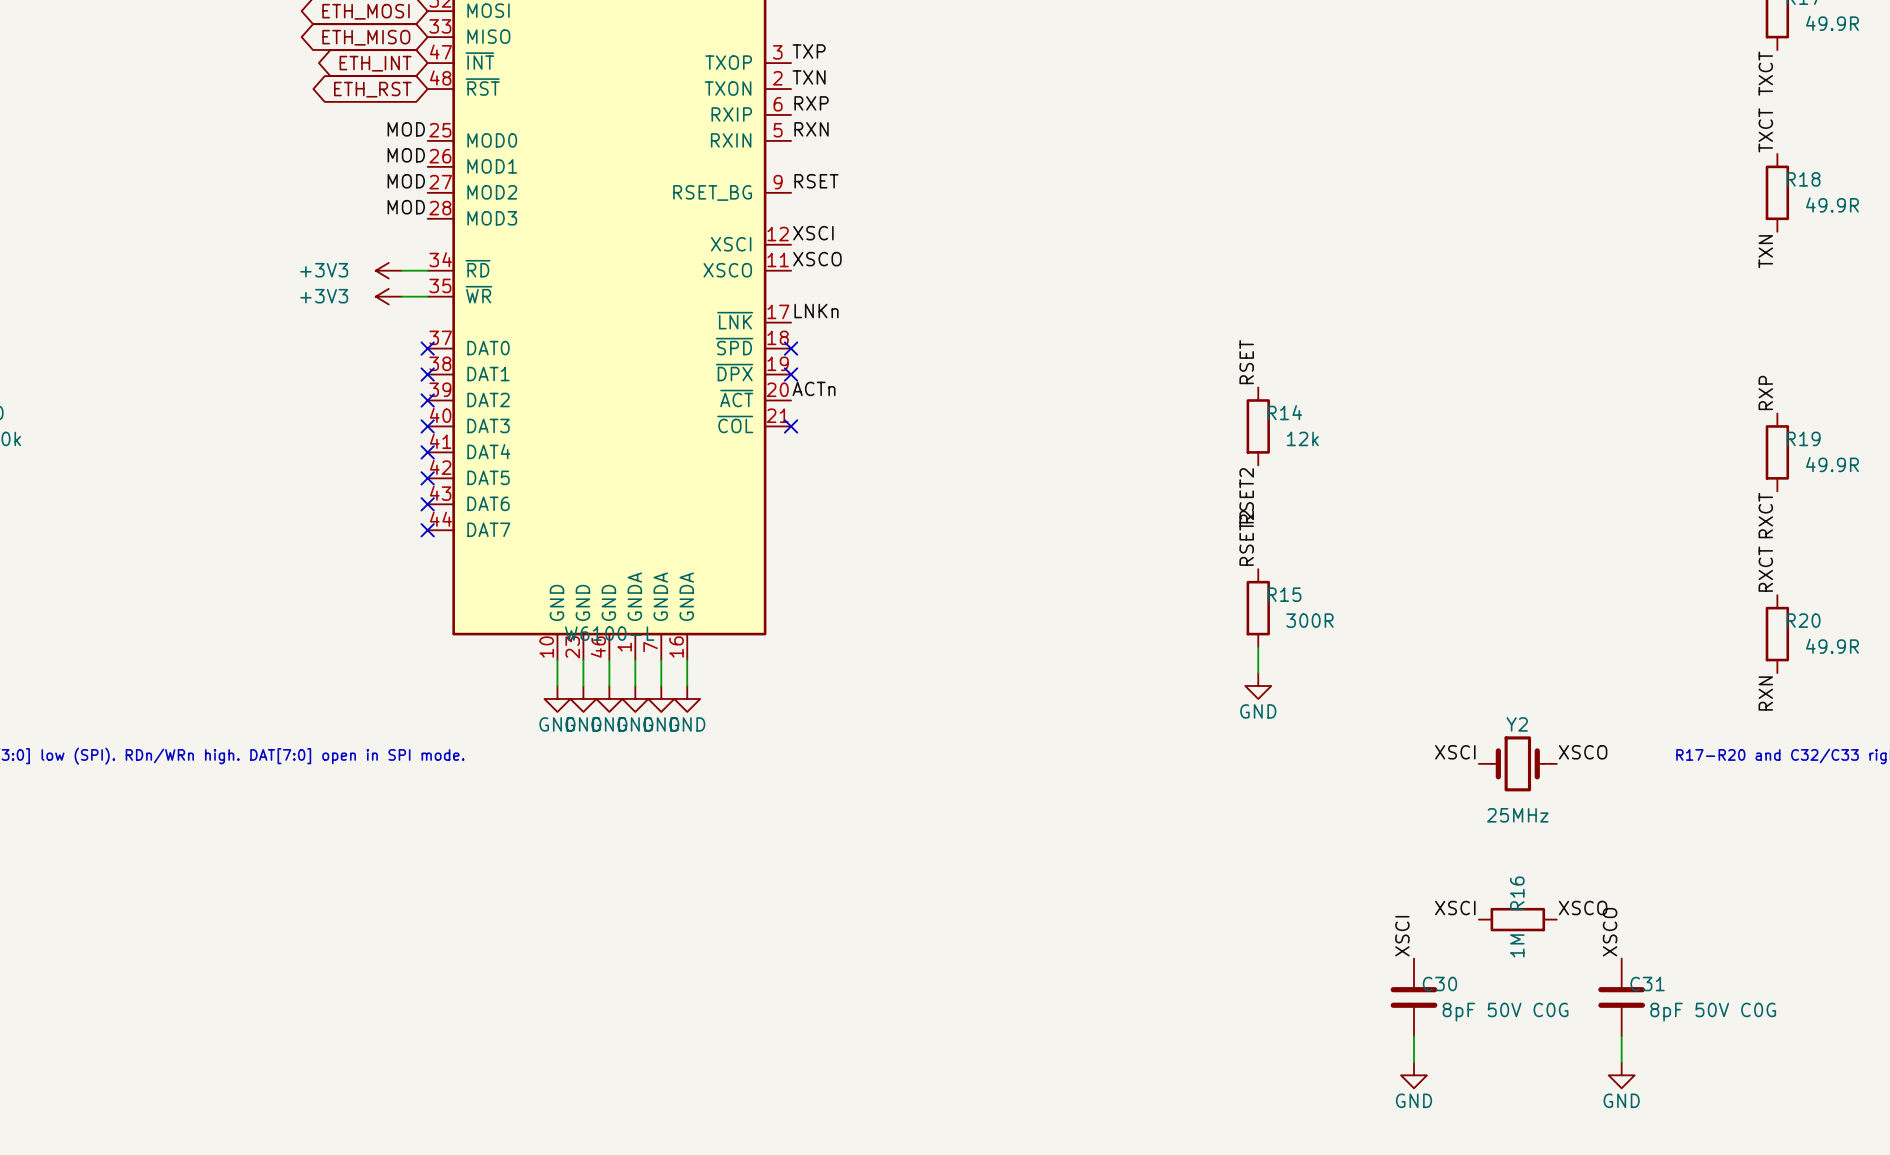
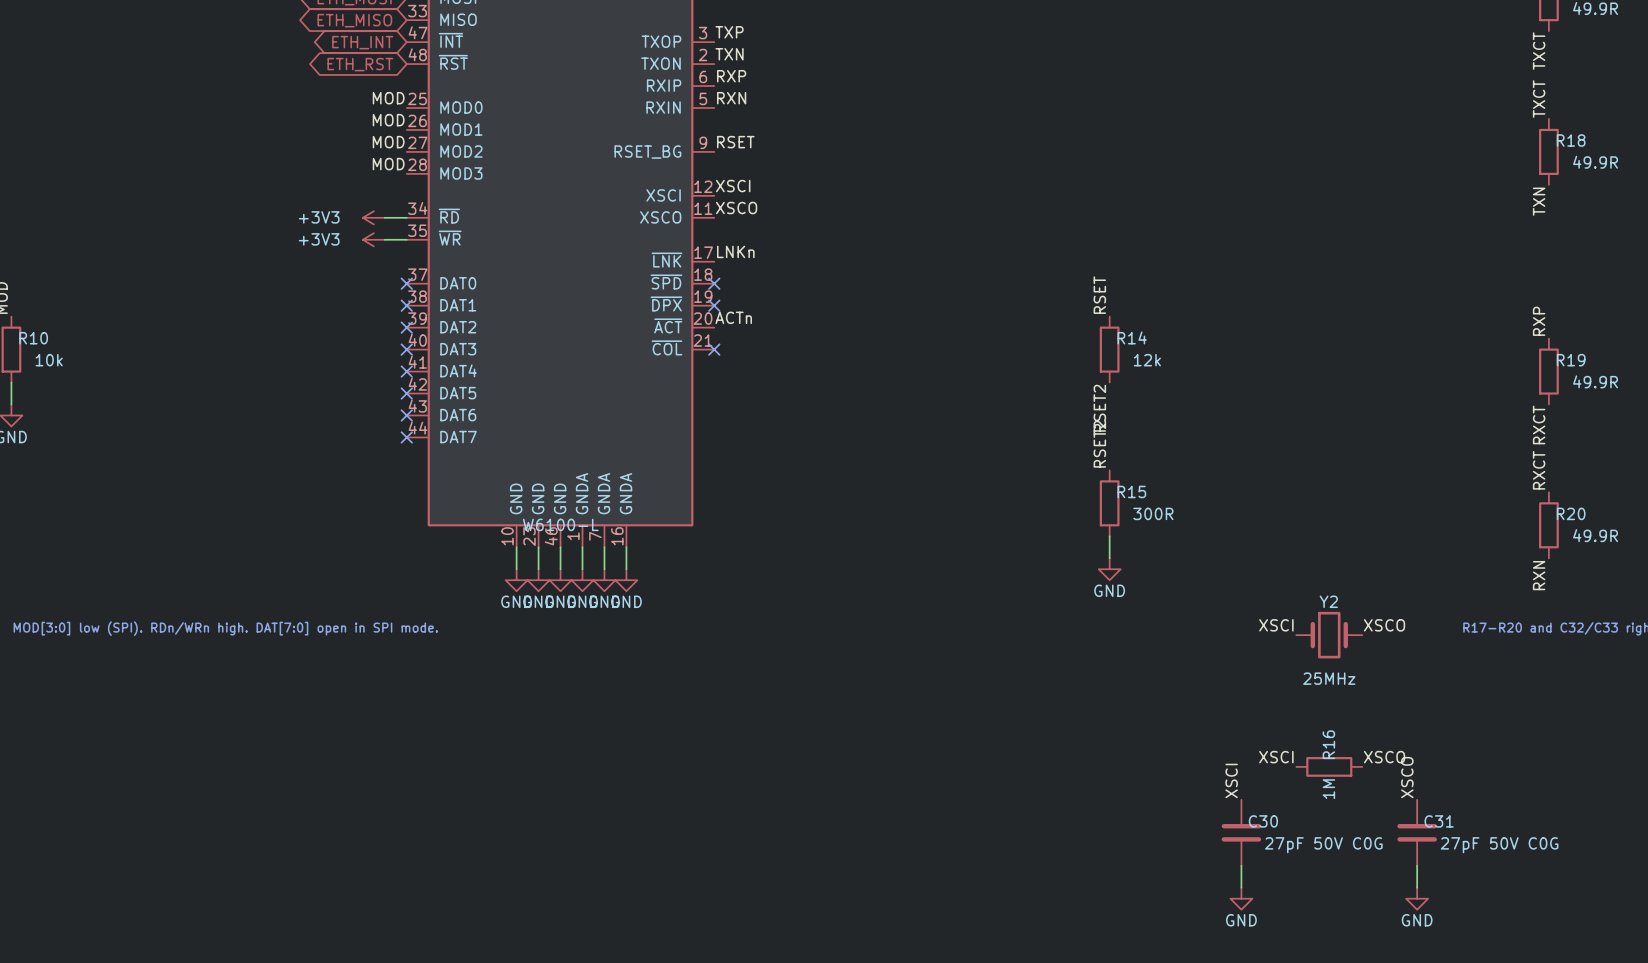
C30 value: 8pF 50V C0G (1505, 1012) -> 27pF 50V C0G (1323, 845)
C31 value: 8pF 50V C0G (1713, 1012) -> 27pF 50V C0G (1499, 845)

